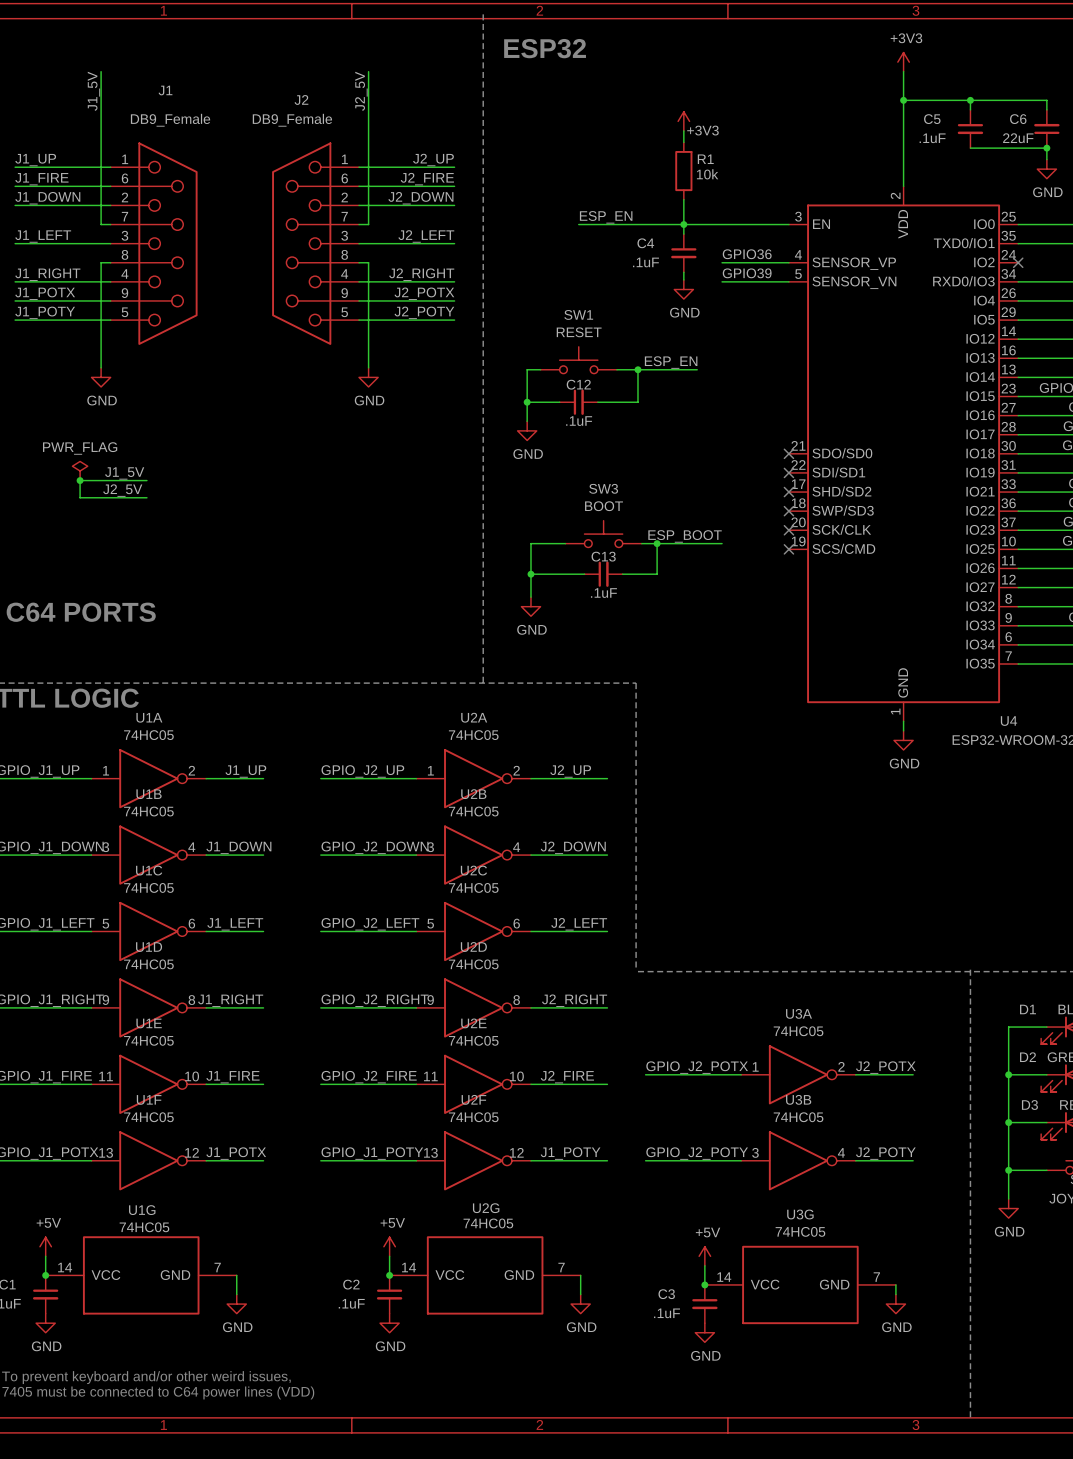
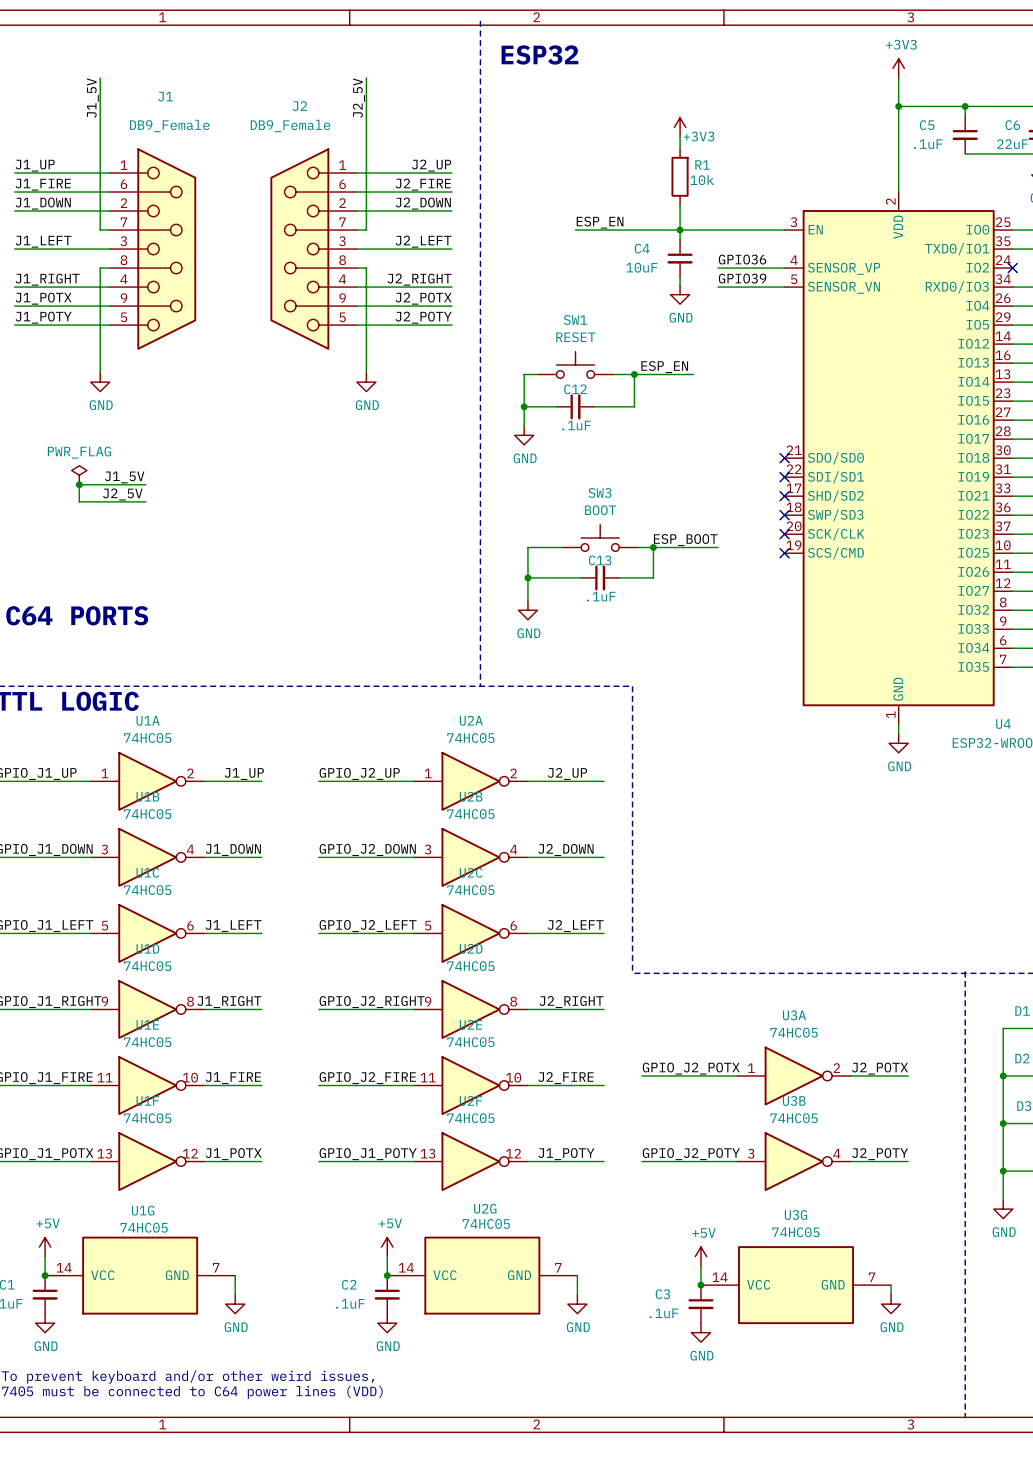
C4 value: .1uF (645, 262) -> 10uF (641, 267)

